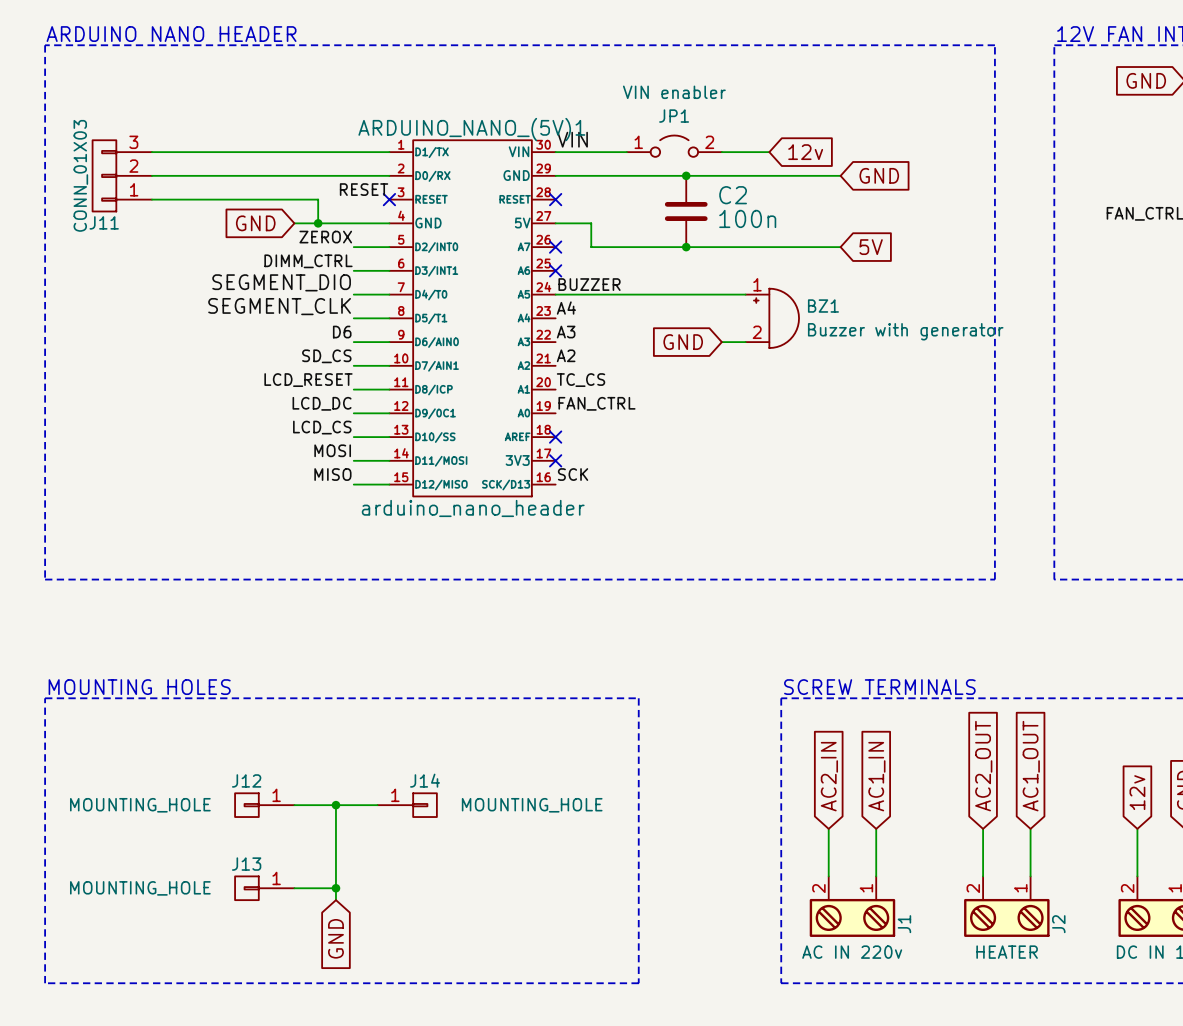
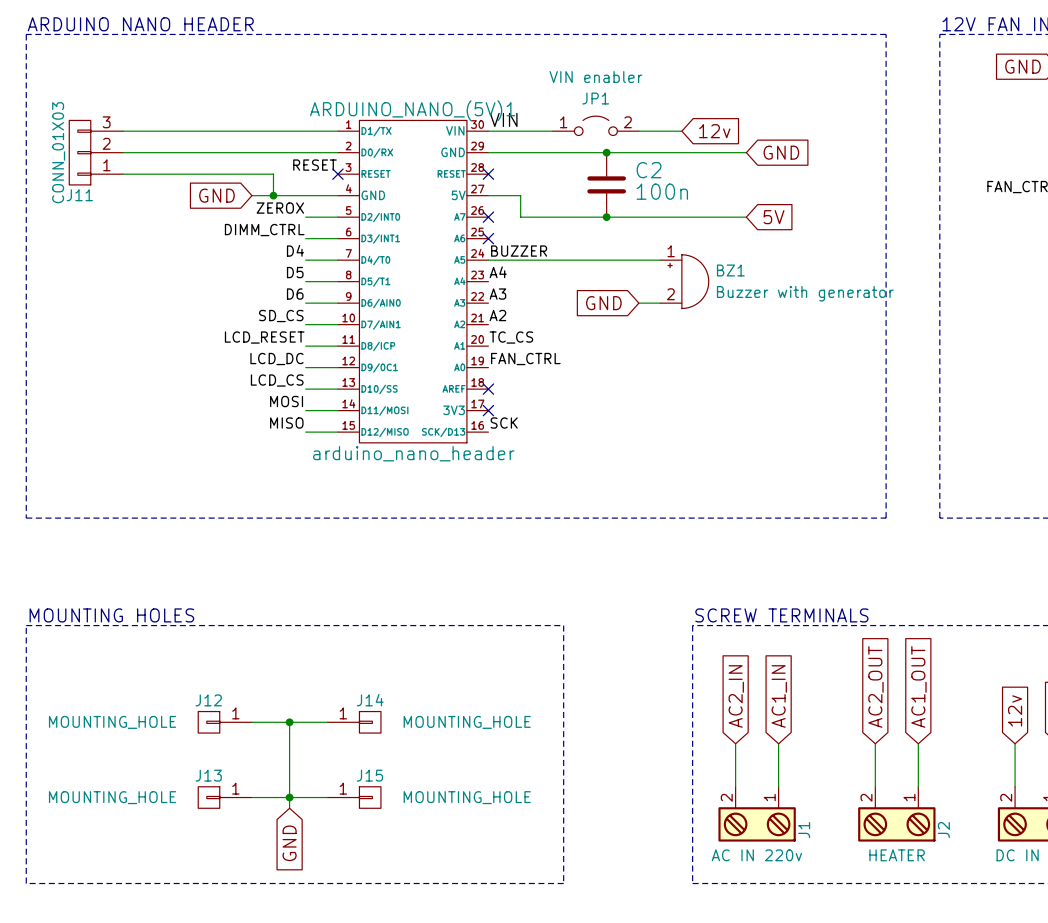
label: SEGMENT_DIO (281, 282) -> D4 (295, 250)
label: SEGMENT_CLK (279, 306) -> D5 (295, 272)
wire: none -> (289, 797) (327, 797)
J15: none -> MOUNTING_HOLE (354, 797)

